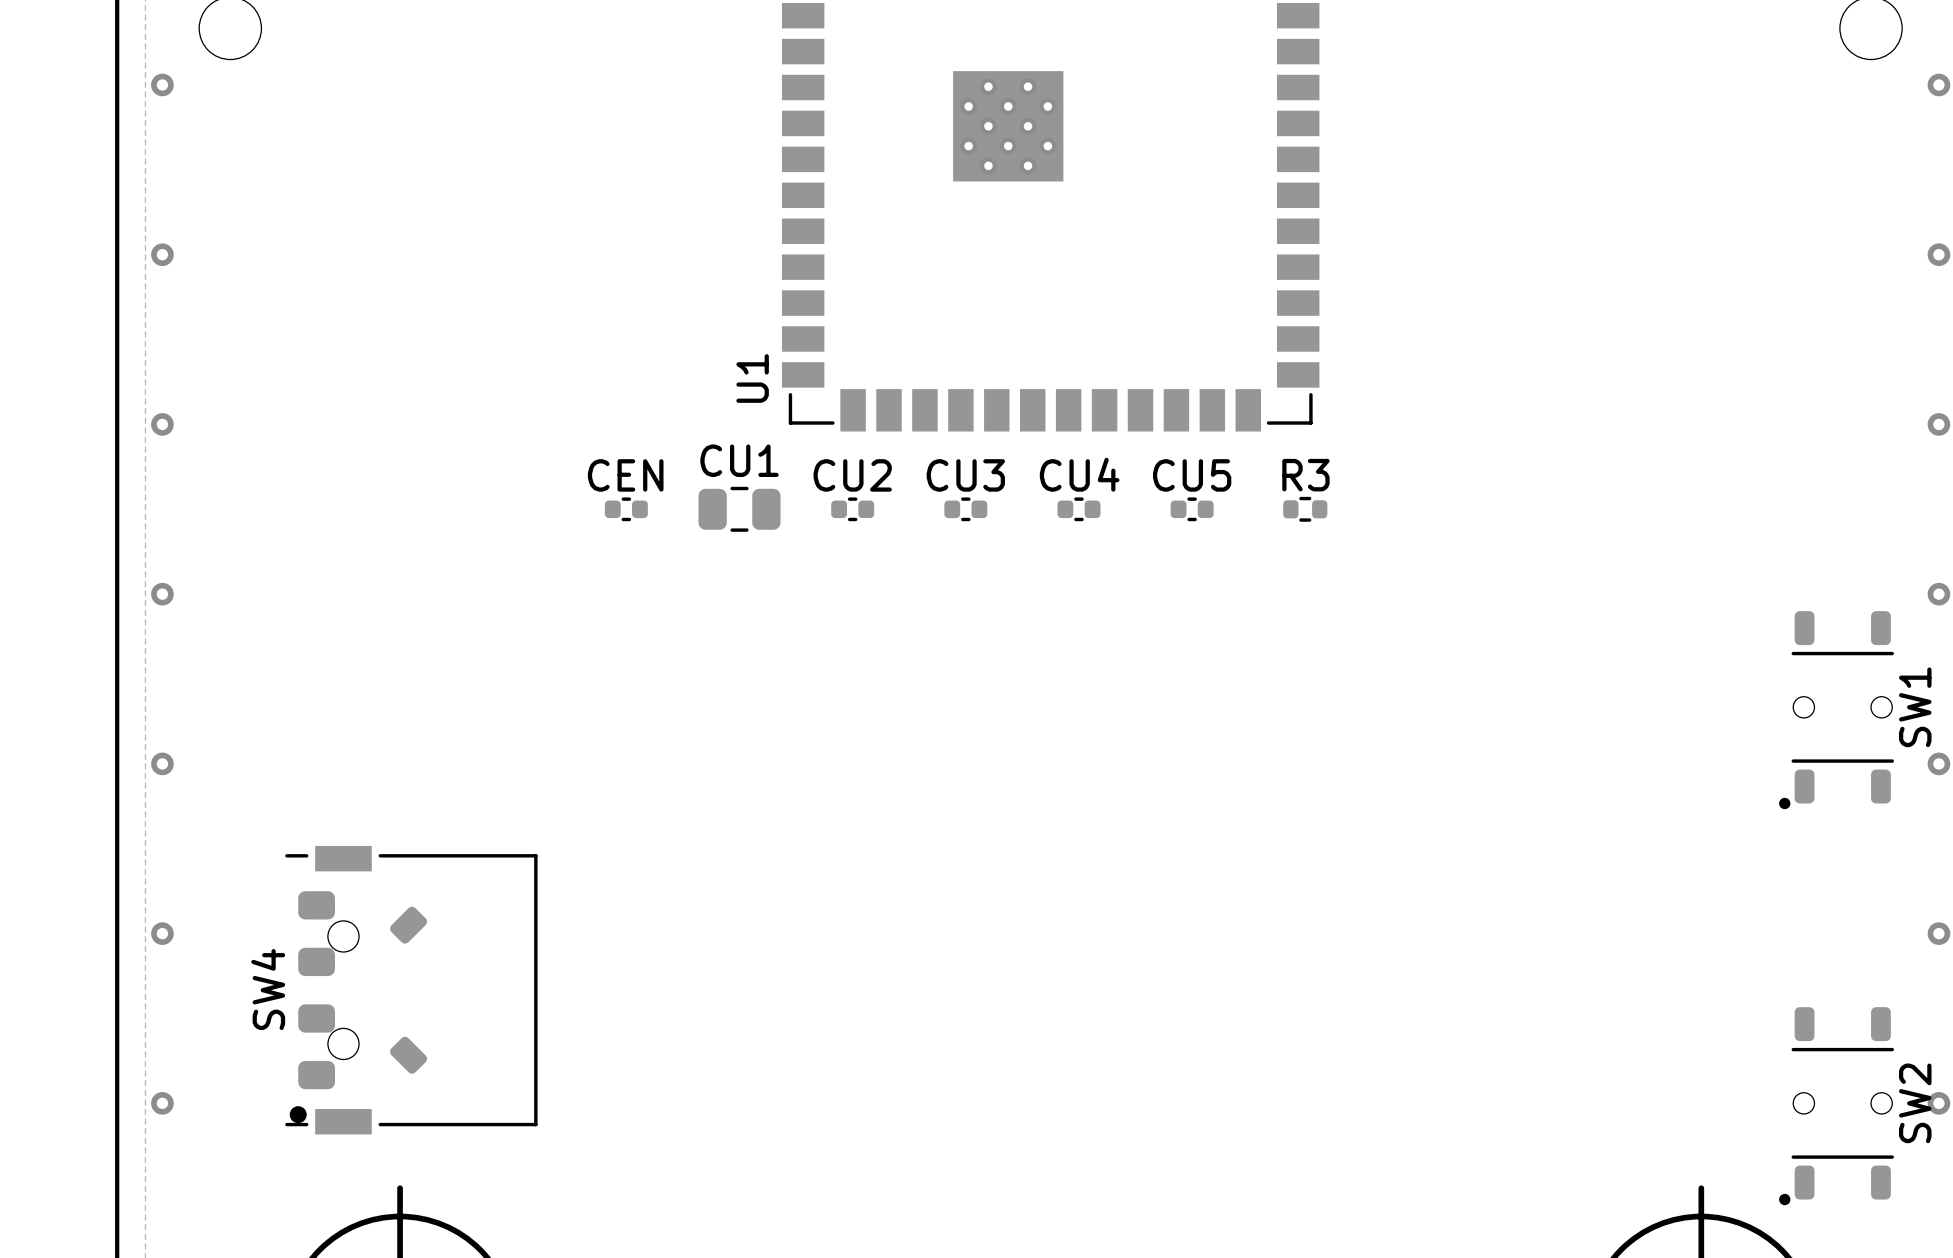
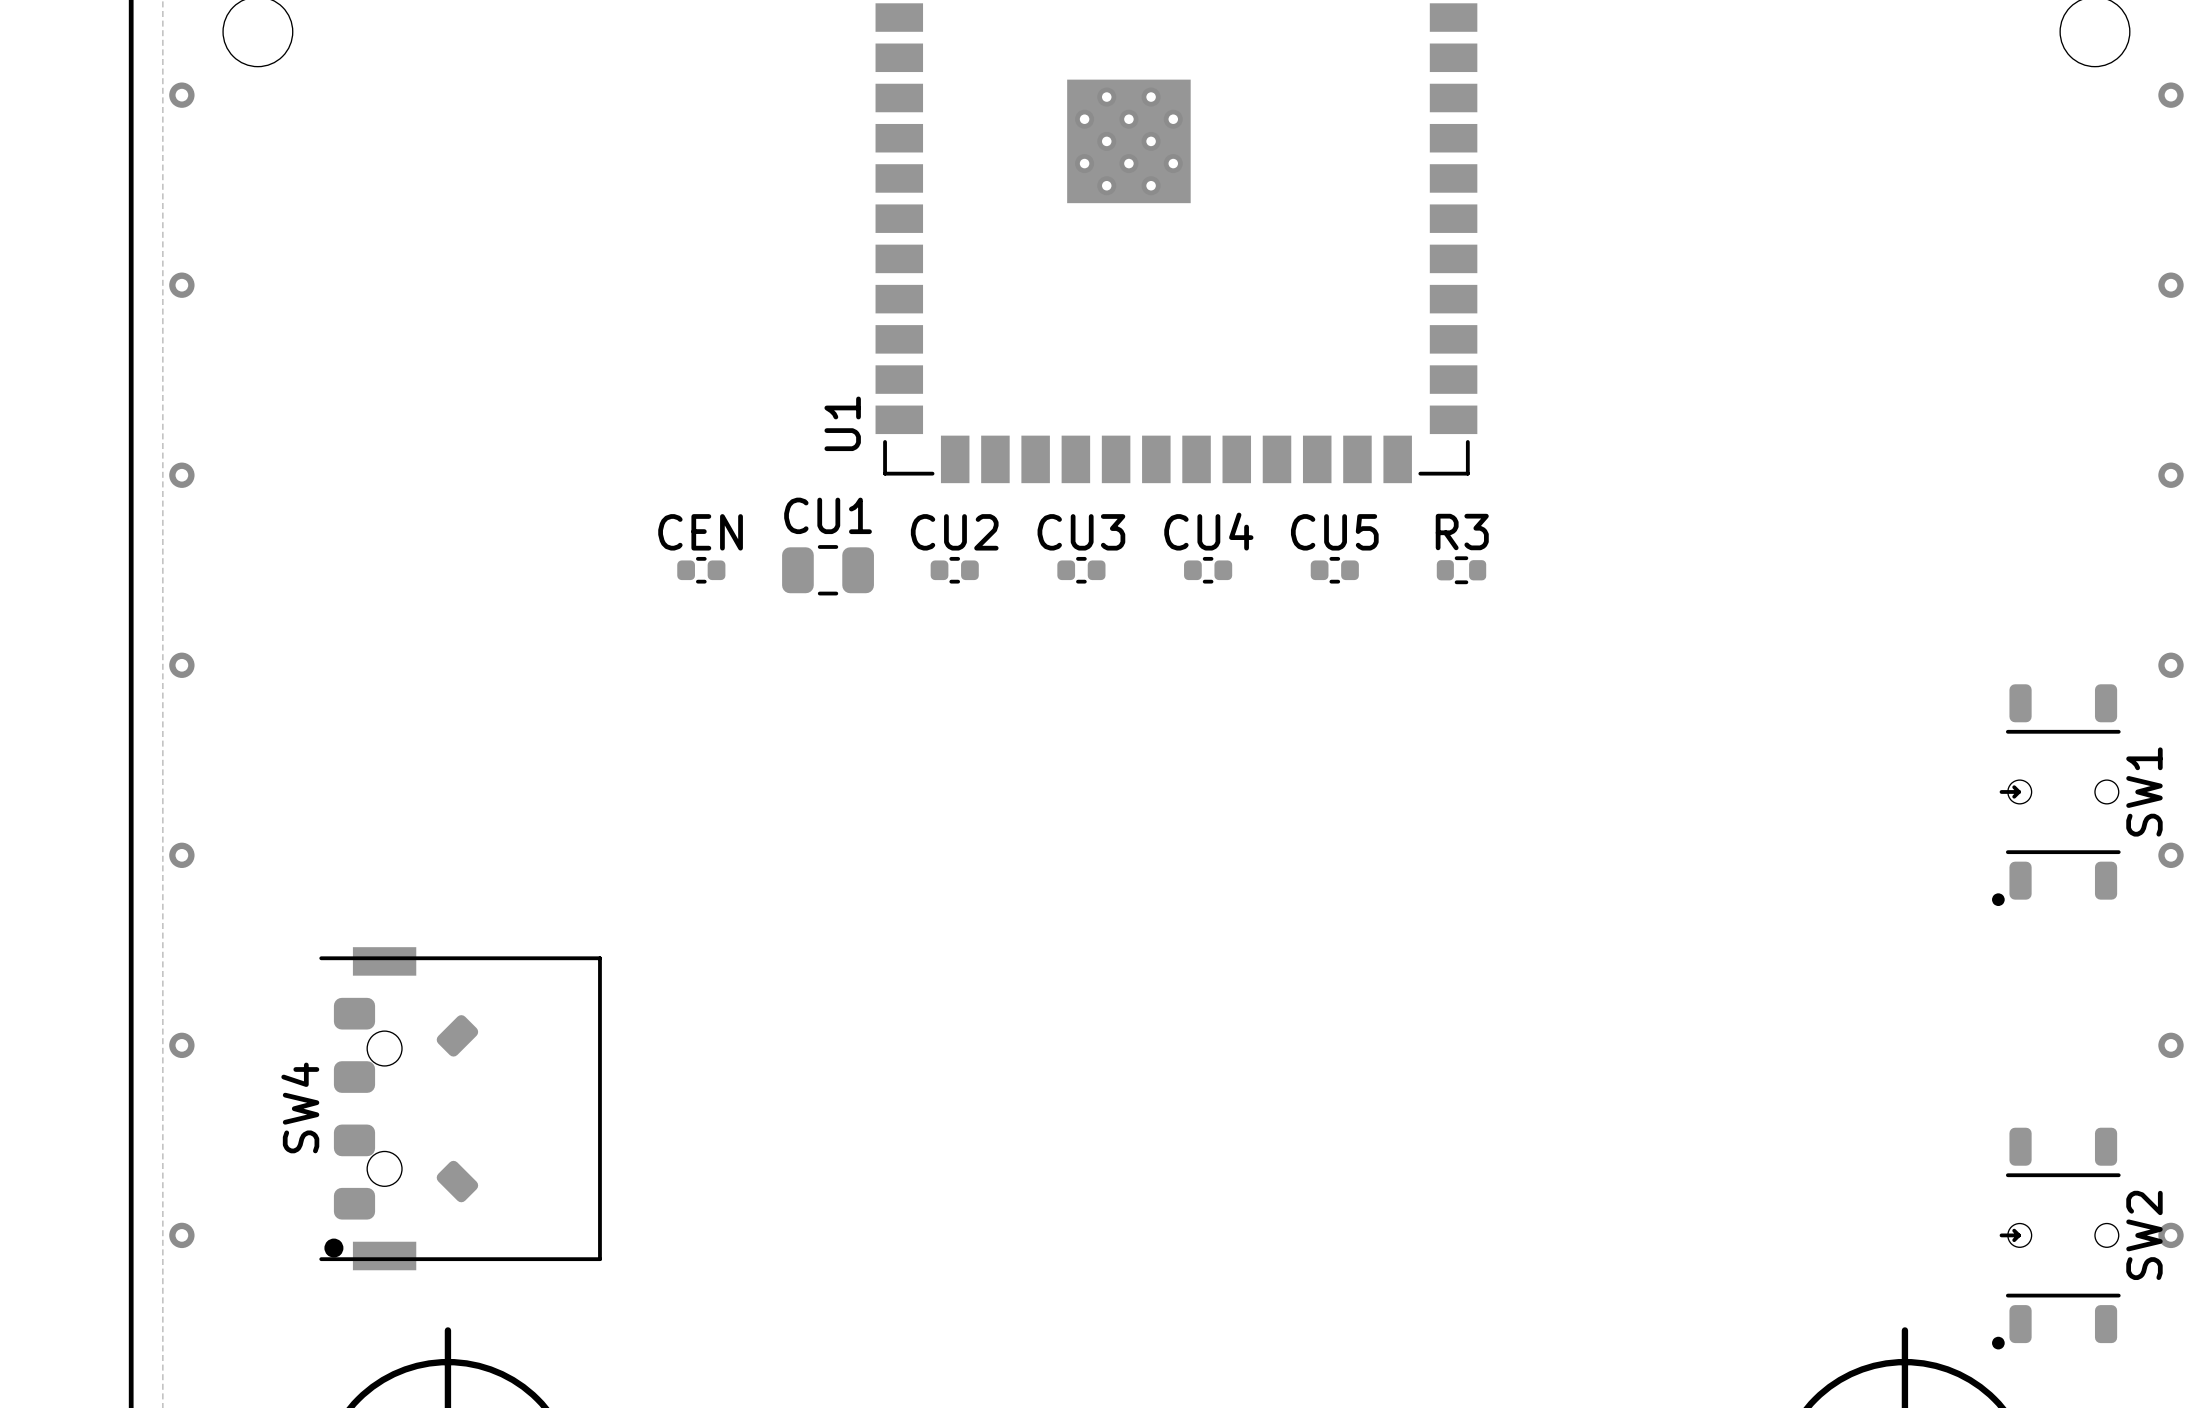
SW1 footprint: [1779, 611, 1894, 810] -> [1992, 684, 2121, 907]
SW4 footprint: [285, 845, 538, 1135] -> [319, 947, 602, 1271]
SW2 footprint: [1779, 1007, 1894, 1206] -> [1992, 1127, 2121, 1350]

